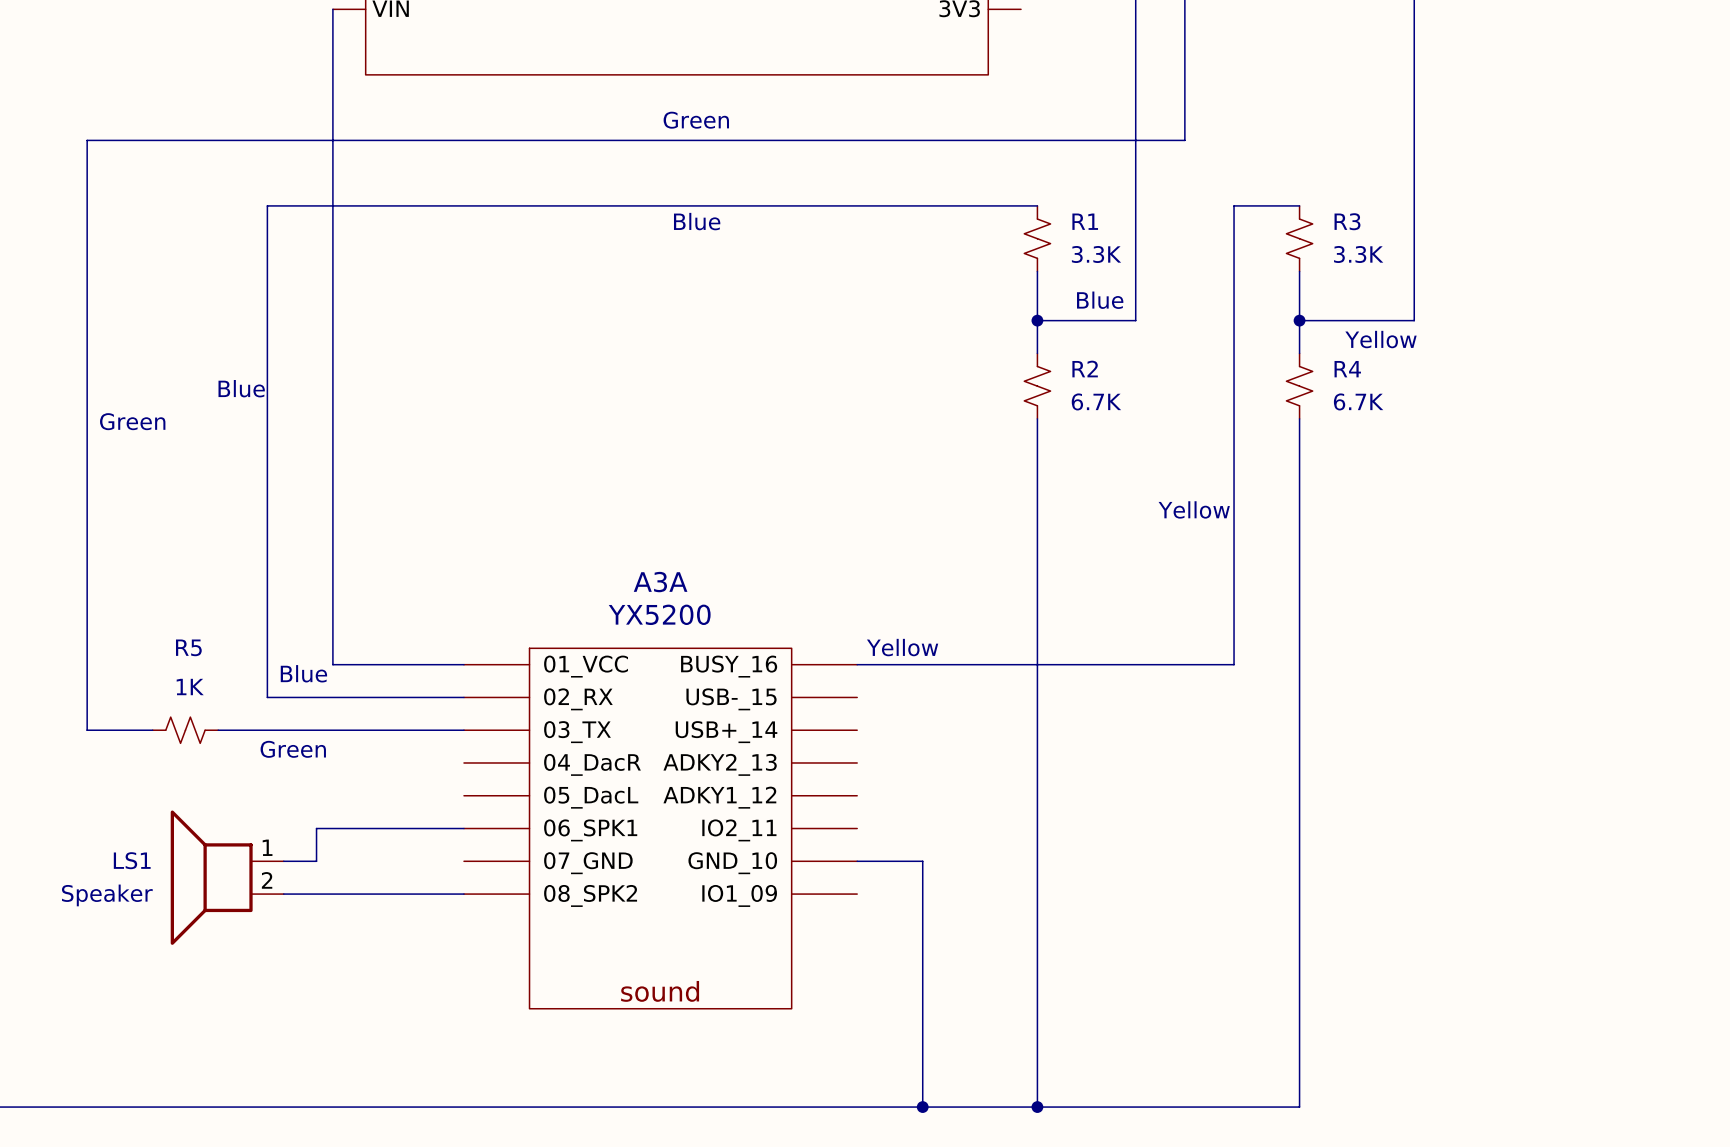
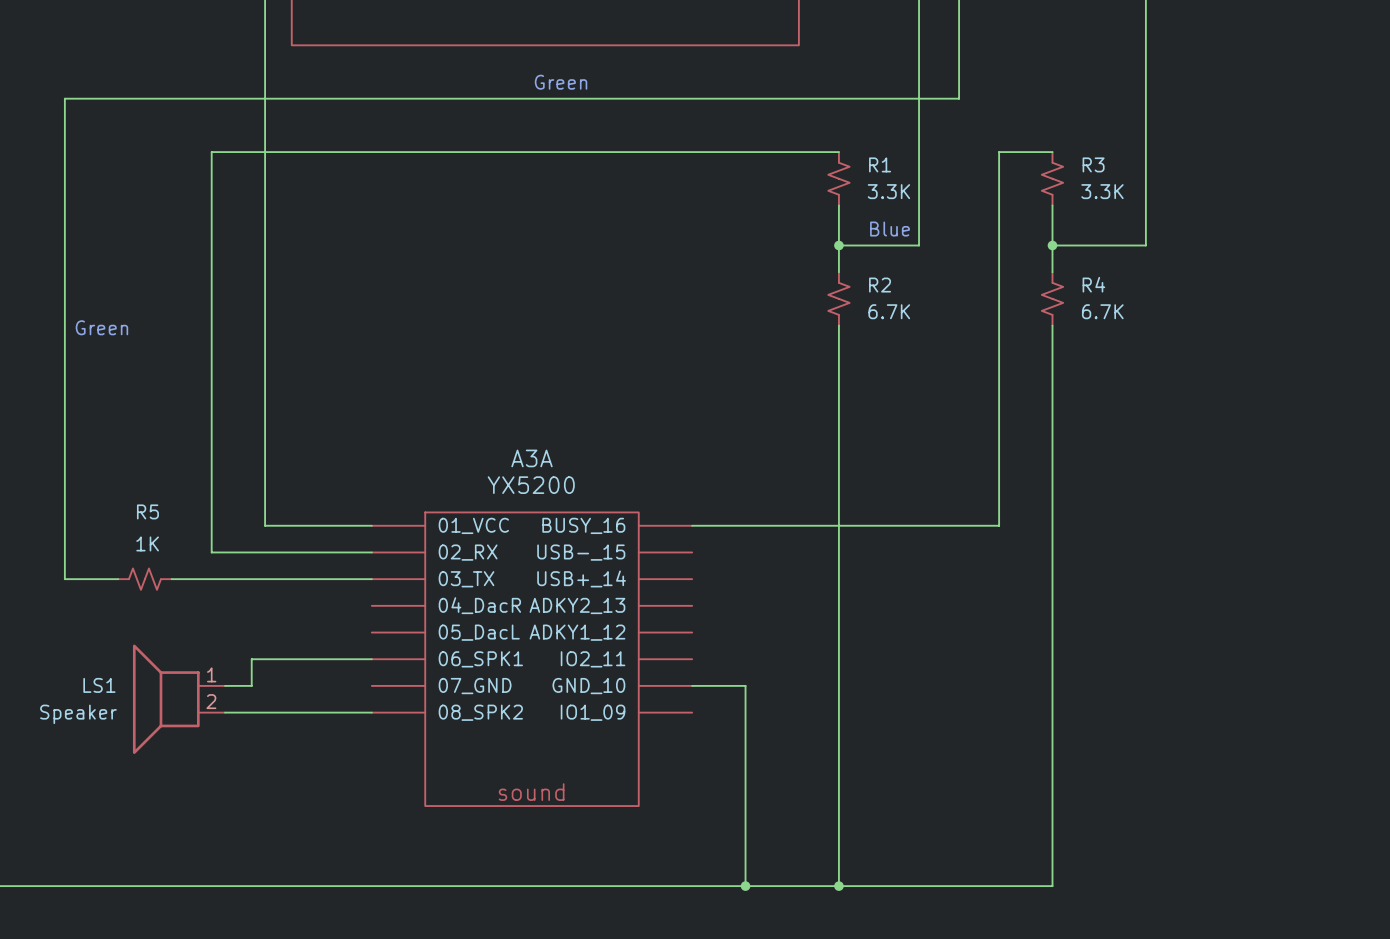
text: Blue (697, 221) -> none
text: Yellow (1380, 339) -> none
text: Blue (241, 388) -> none
text: Yellow (1194, 509) -> none
text: Yellow (902, 647) -> none
text: Blue (303, 673) -> none
text: Green (293, 749) -> none

